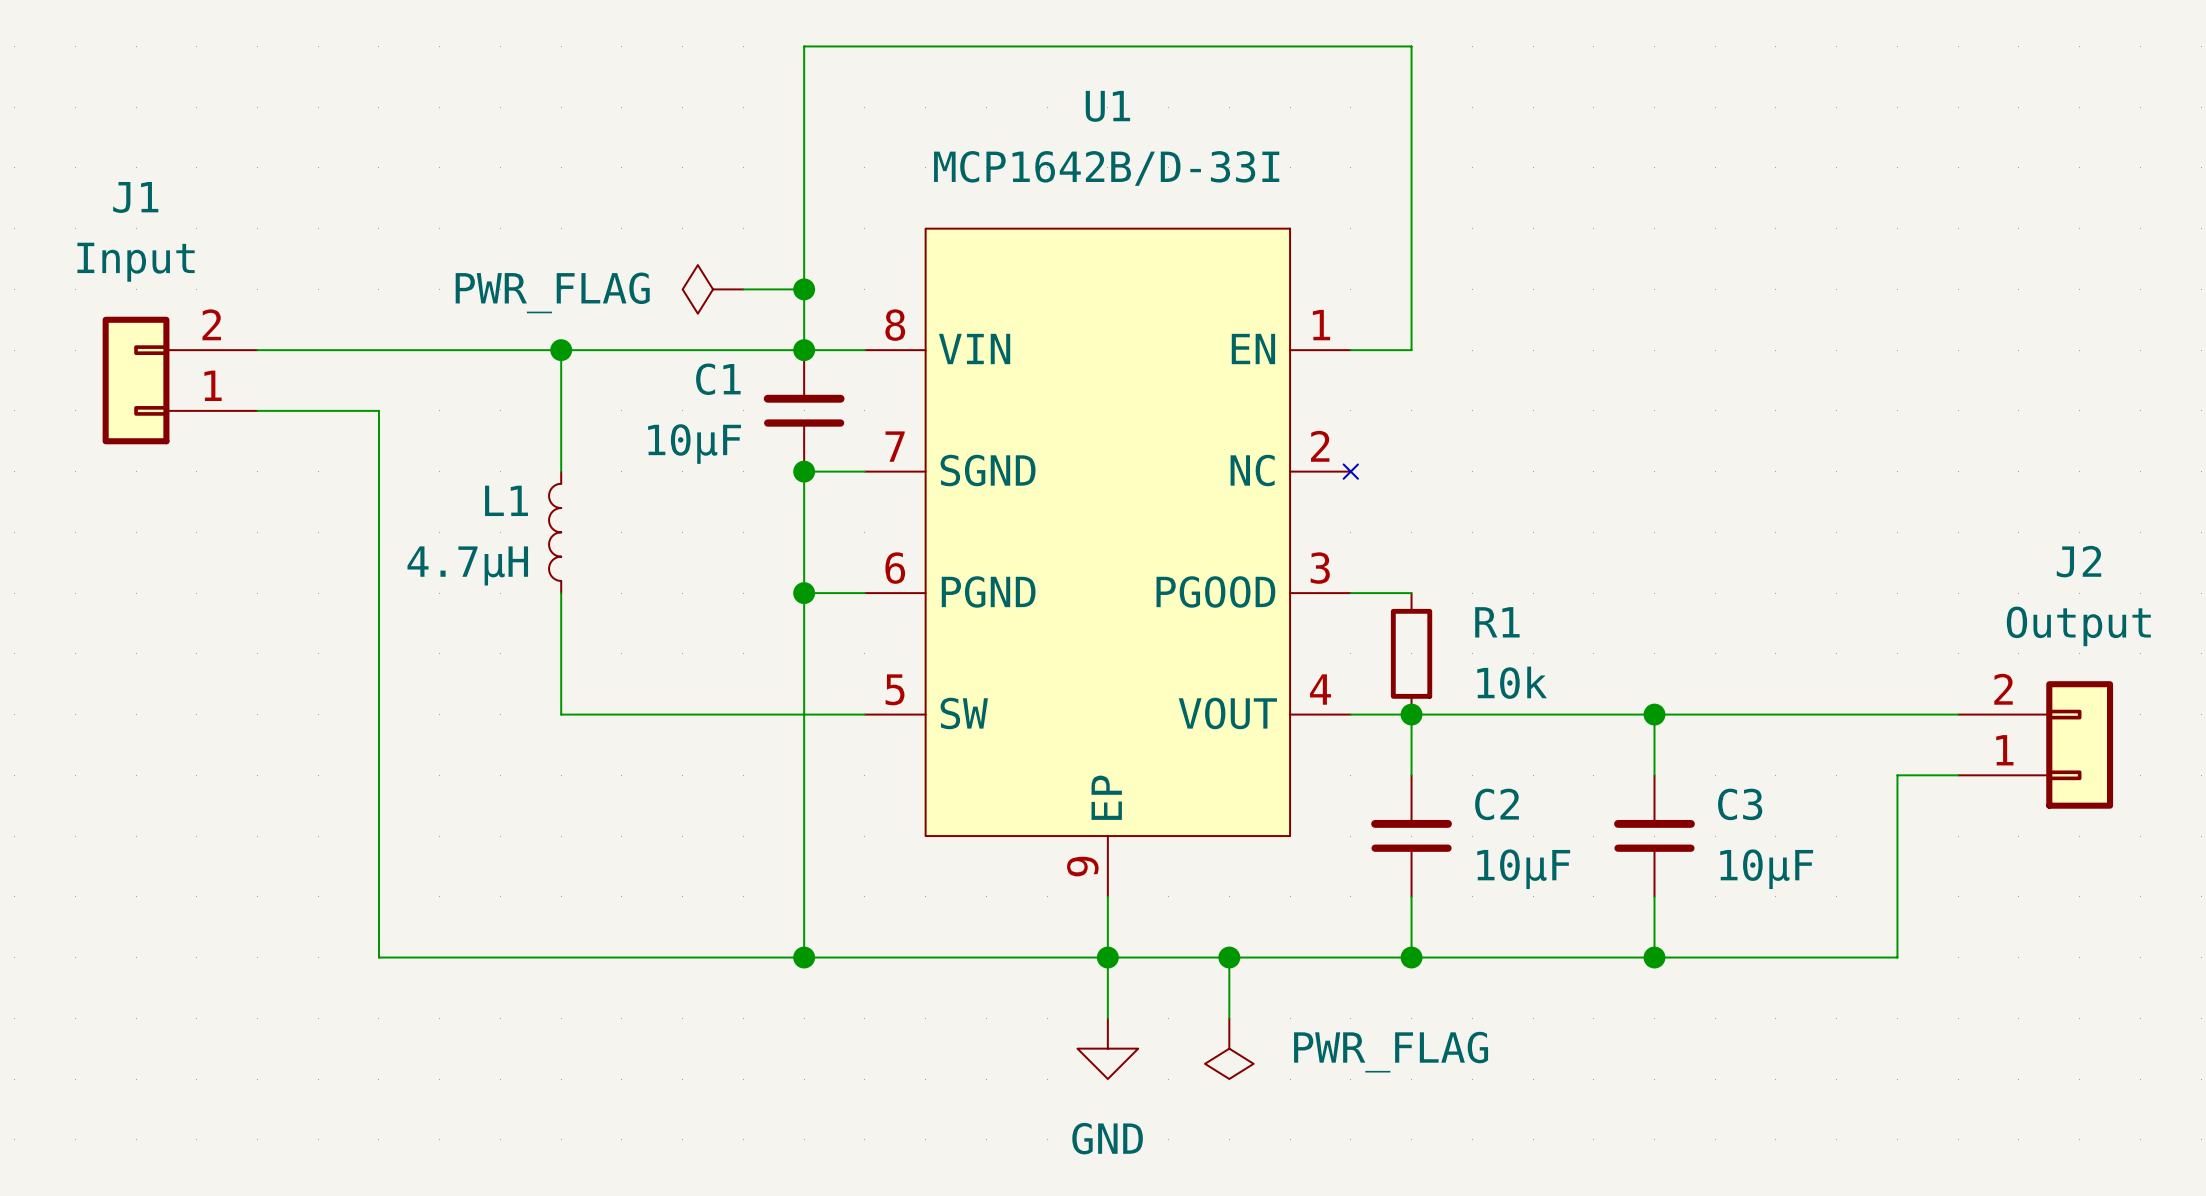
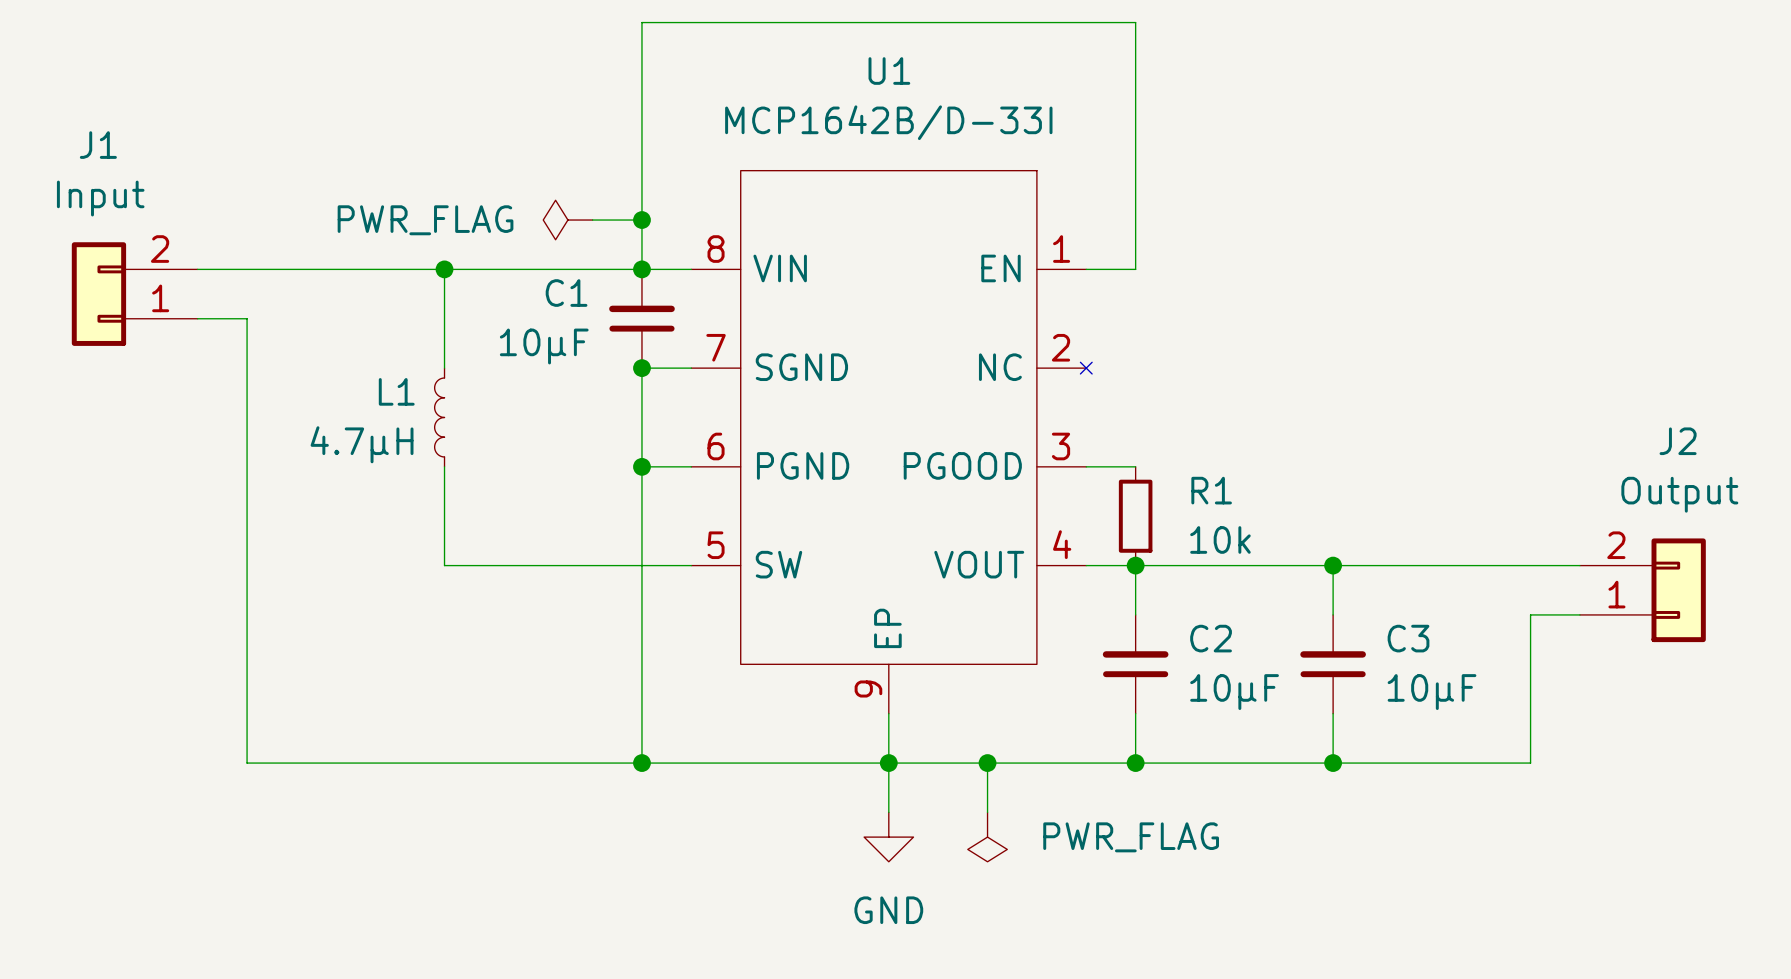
U1 symbol: [864, 228, 1358, 897] -> [691, 170, 1093, 714]
wire: (318, 410) (378, 410) (378, 957) -> (247, 318) (247, 763) (296, 763)

